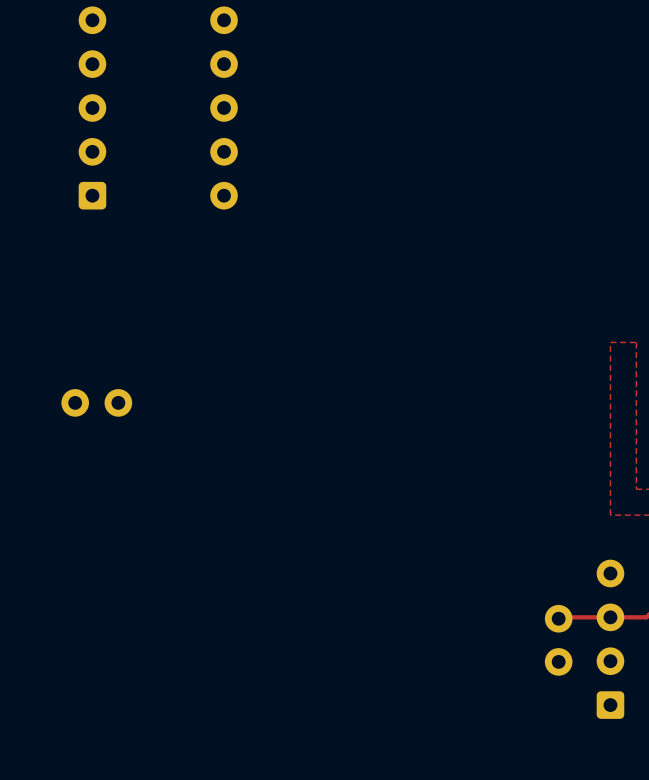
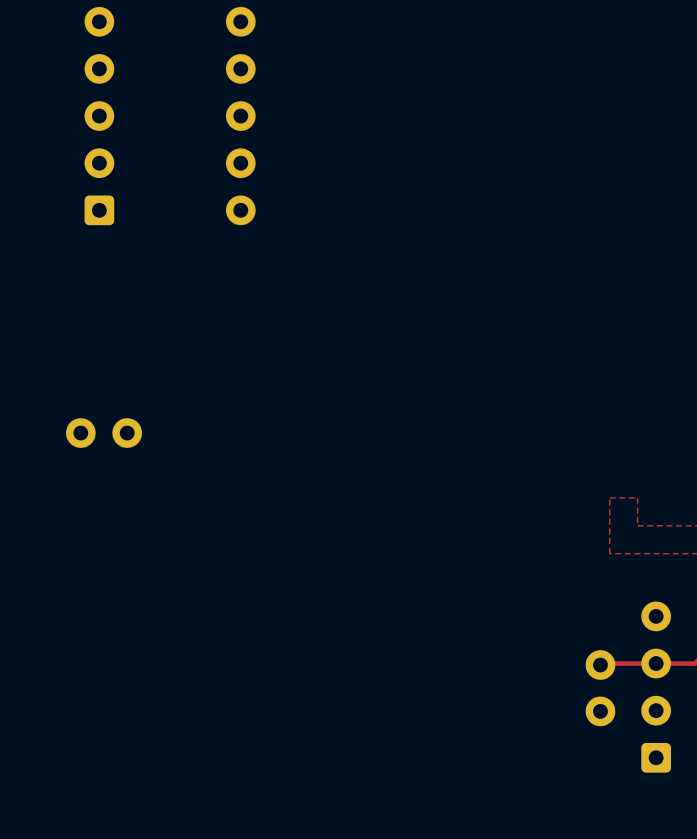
top zone outline: (636, 489) (636, 342) (610, 342) (610, 515) -> (683, 525) (637, 525) (637, 497) (609, 497) (609, 553) (656, 553)

